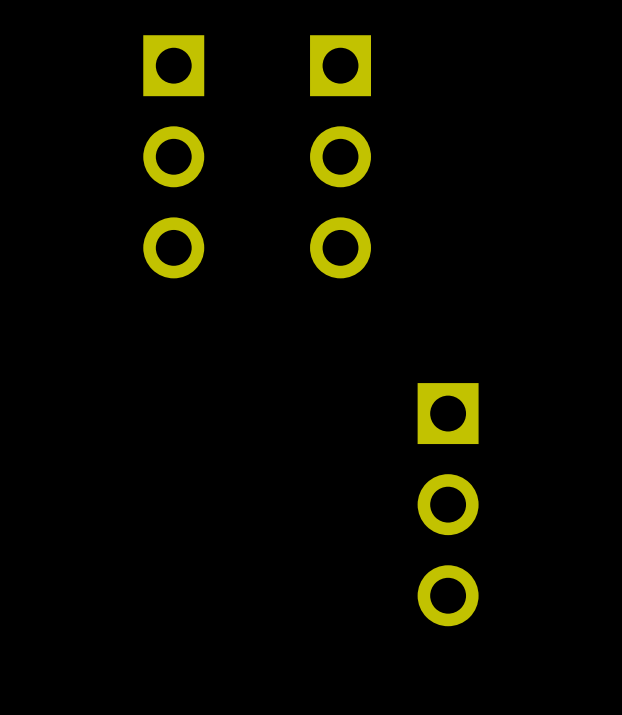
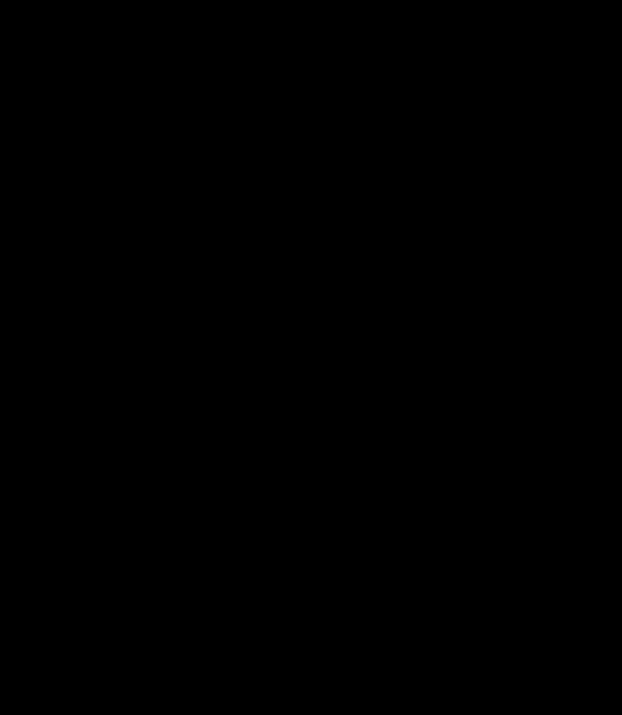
part: (173, 156) -> none
part: (340, 156) -> none
part: (448, 504) -> none

